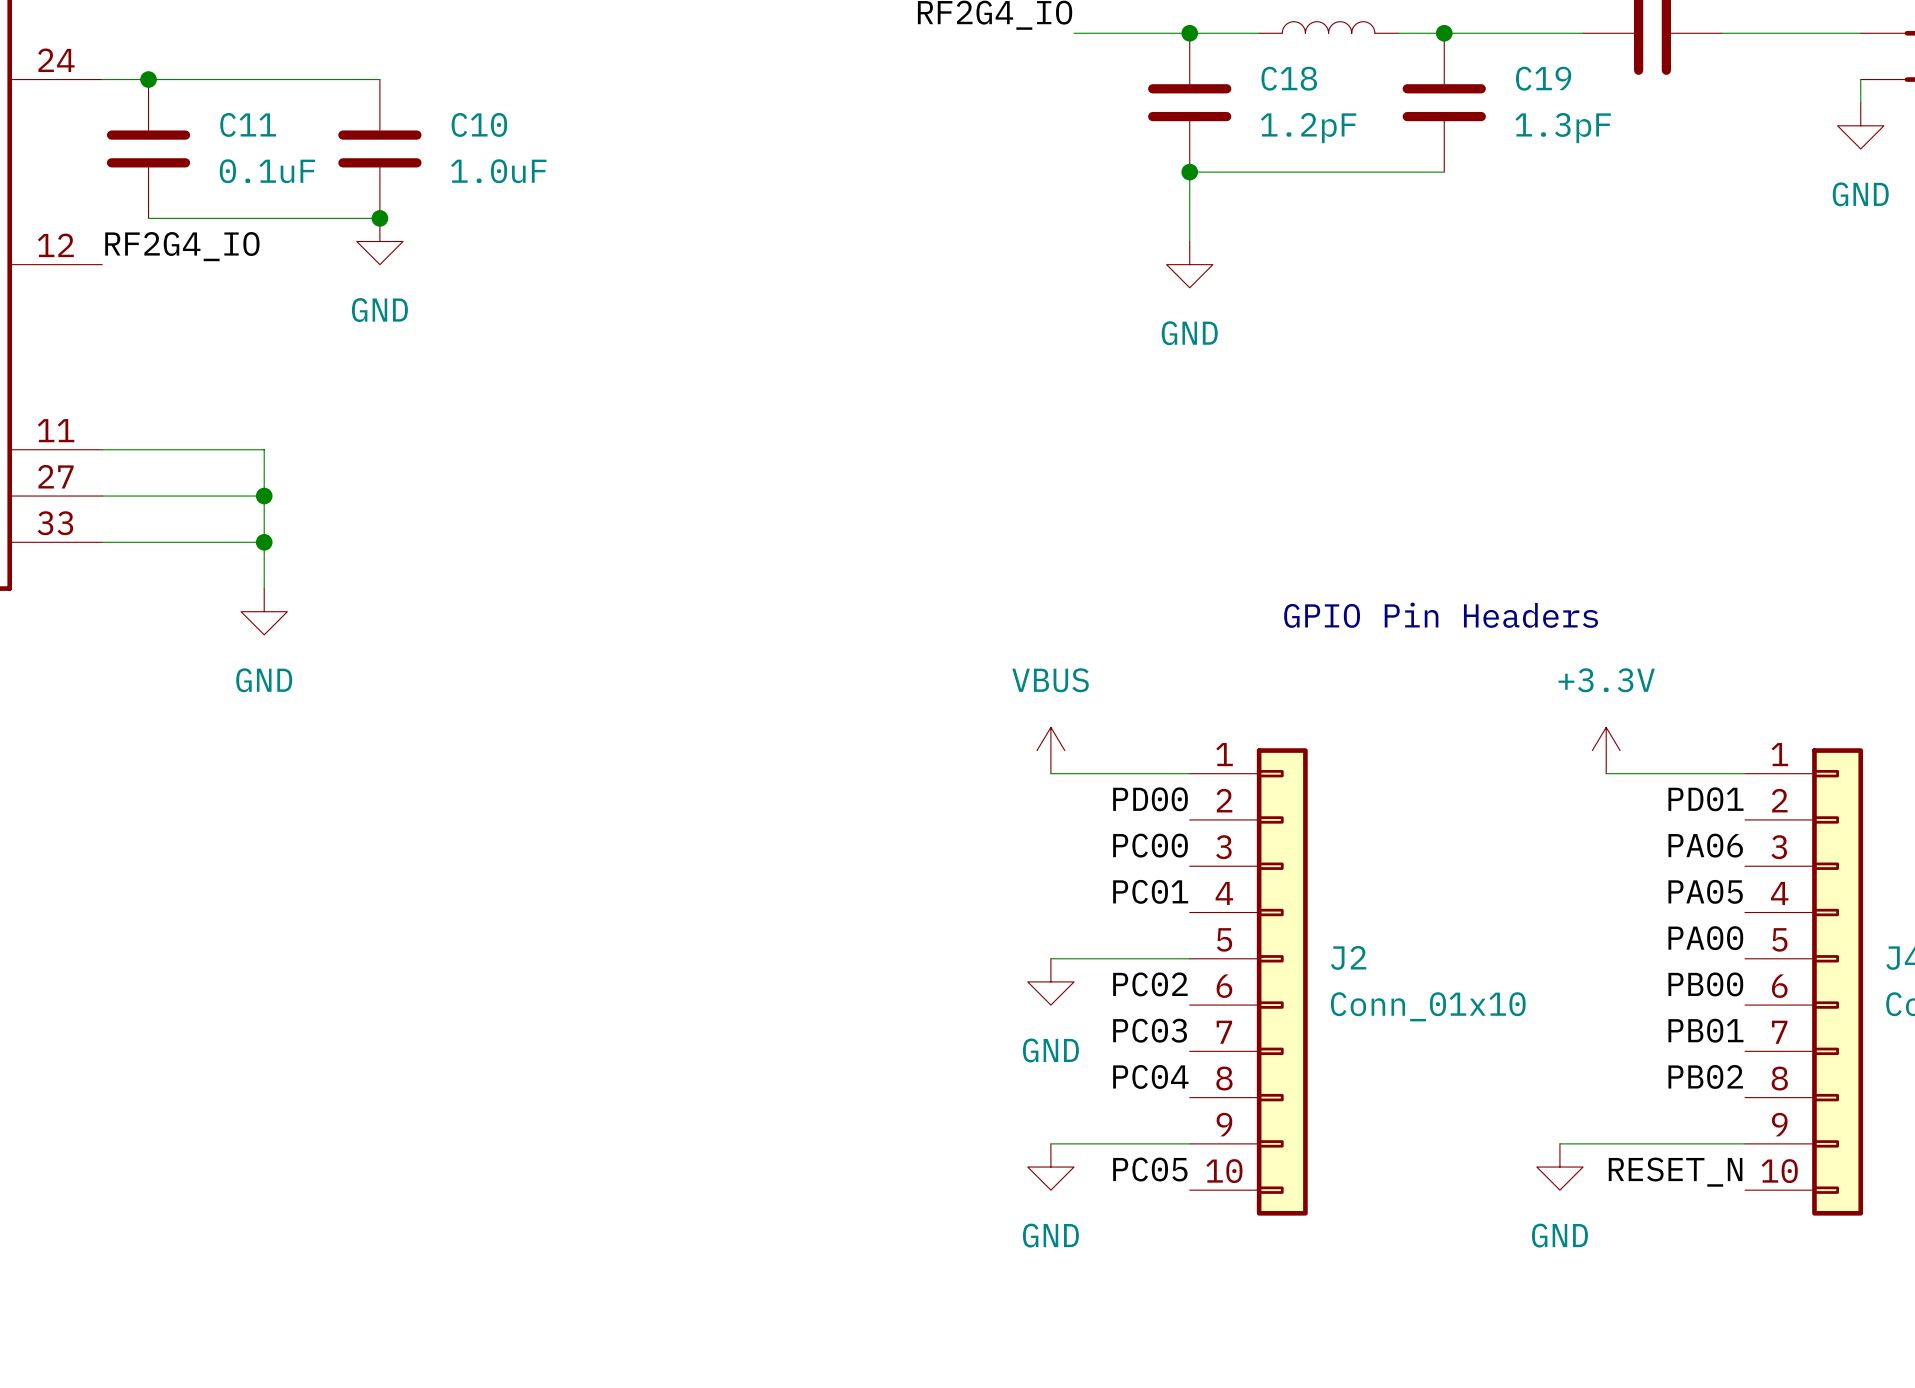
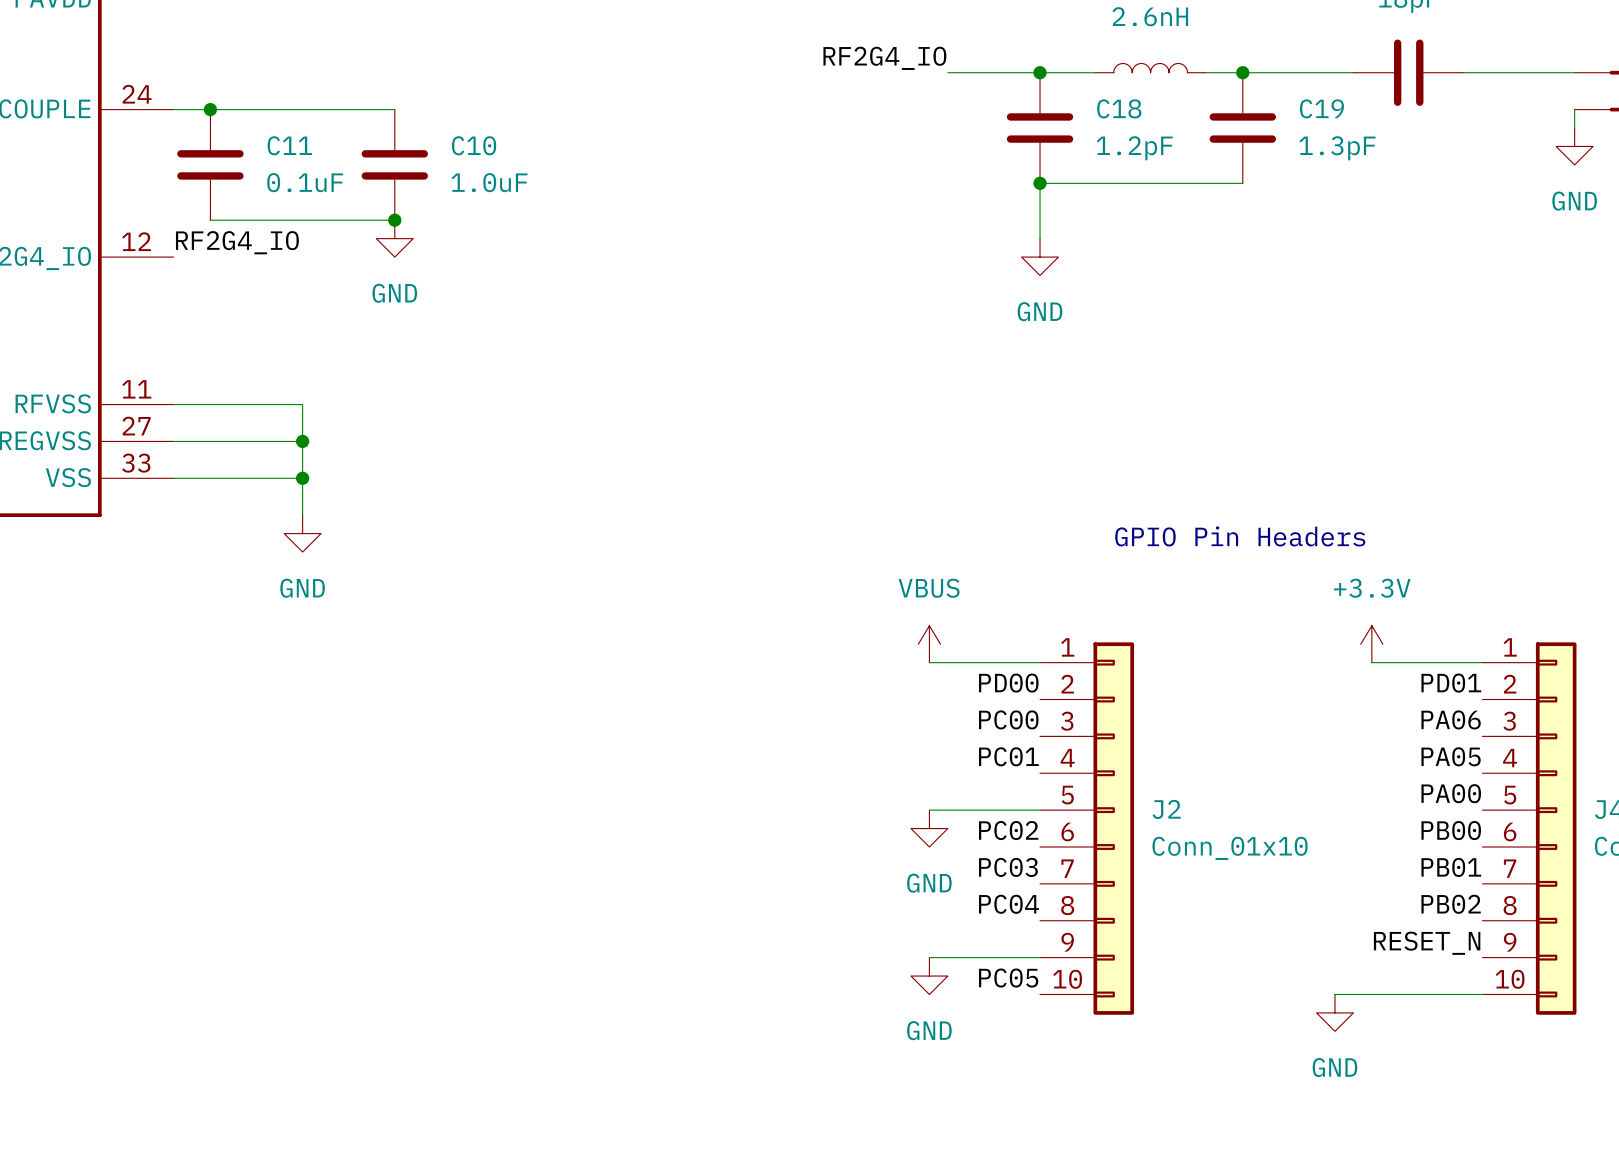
wire: (1559, 1143) (1745, 1143) -> (1334, 994) (1482, 994)
power symbol position: GND (1559, 1167) -> GND (1334, 1012)
label position: RESET_N (1675, 1172) -> RESET_N (1427, 943)

